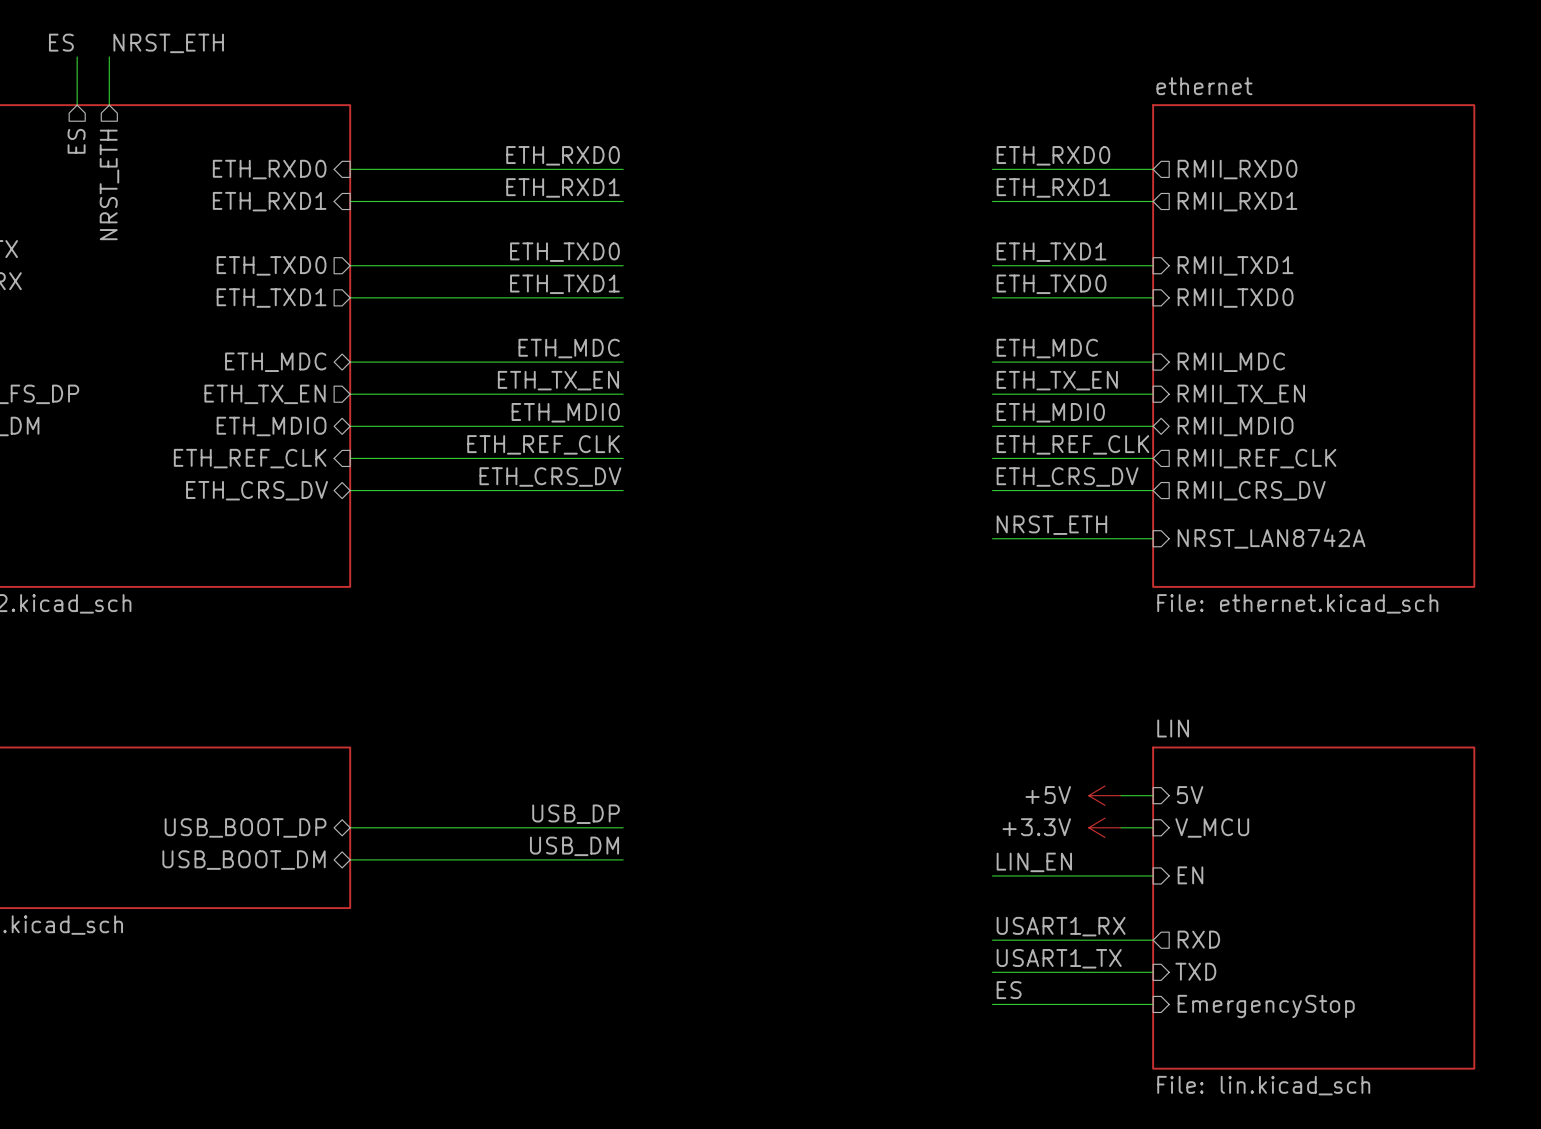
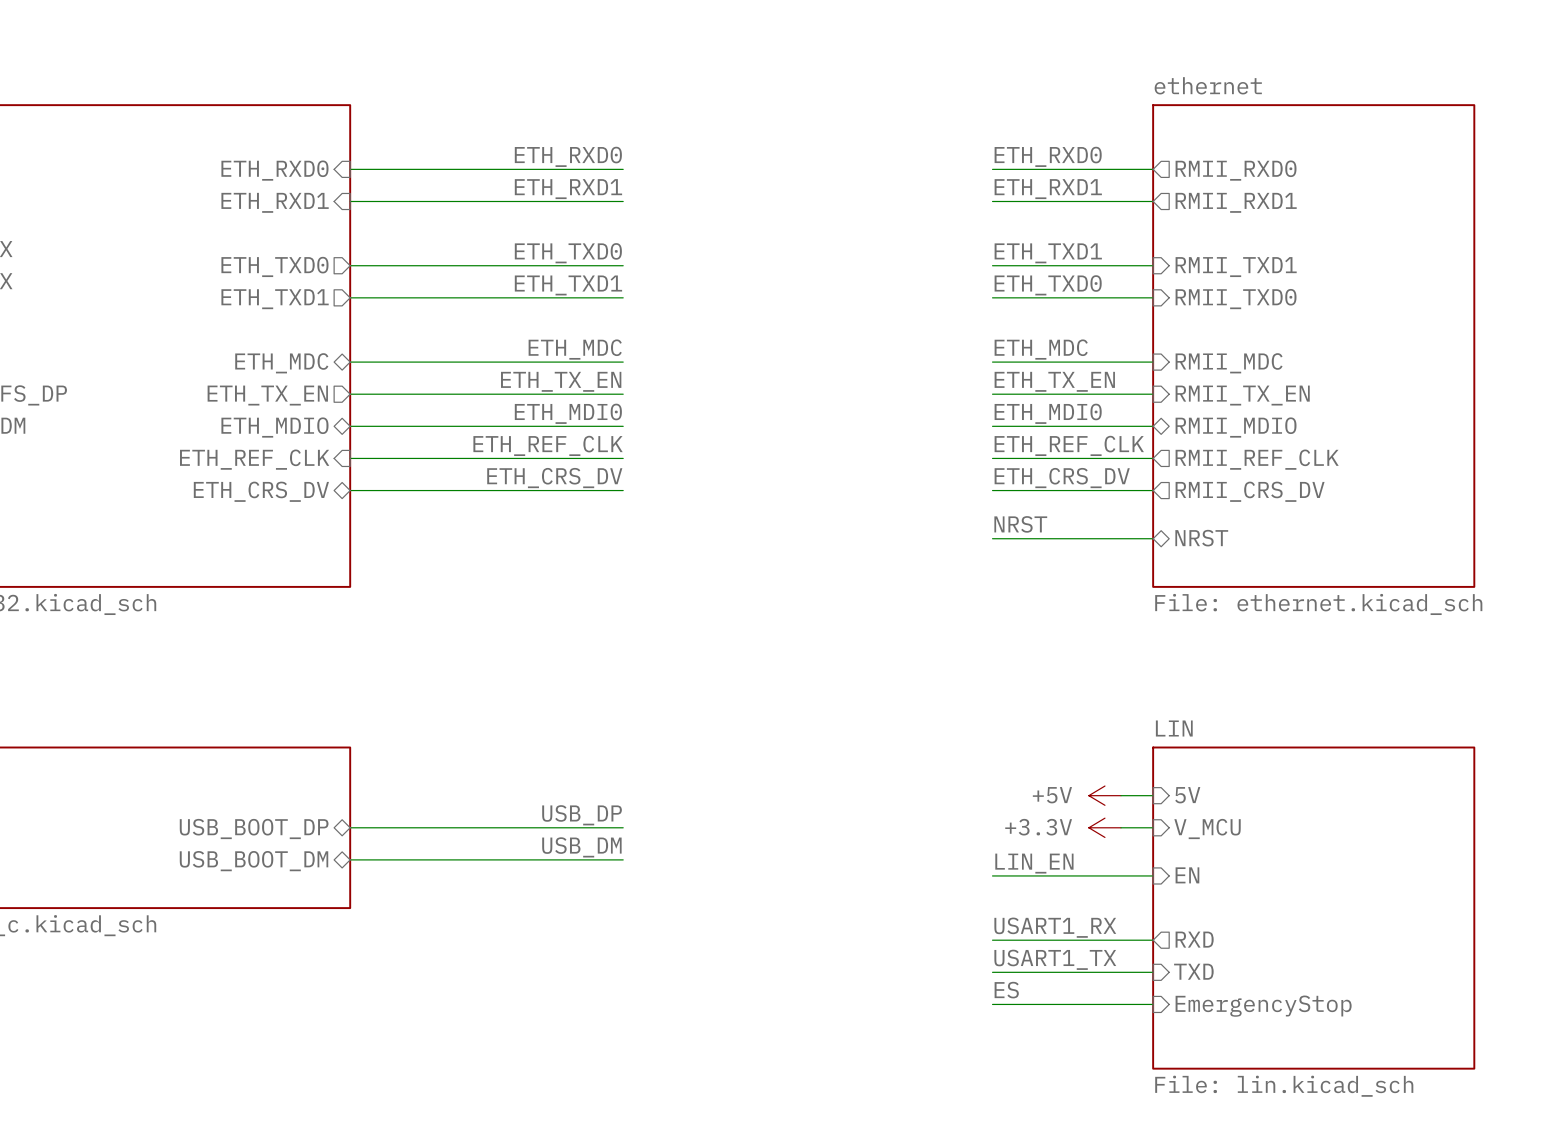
label: ES (61, 42) -> none
label: NRST_ETH (168, 43) -> none
wire: (77, 56) (77, 105) -> none
wire: (109, 56) (109, 105) -> none
sheet pin: ES (76, 141) -> none
sheet pin: NRST_ETH (109, 184) -> none
label: NRST_ETH (1051, 525) -> NRST (1020, 524)
sheet pin shape: input (1271, 538) -> bidirectional (1201, 538)
sheet pin: NRST_LAN8742A (1271, 538) -> NRST (1201, 538)

